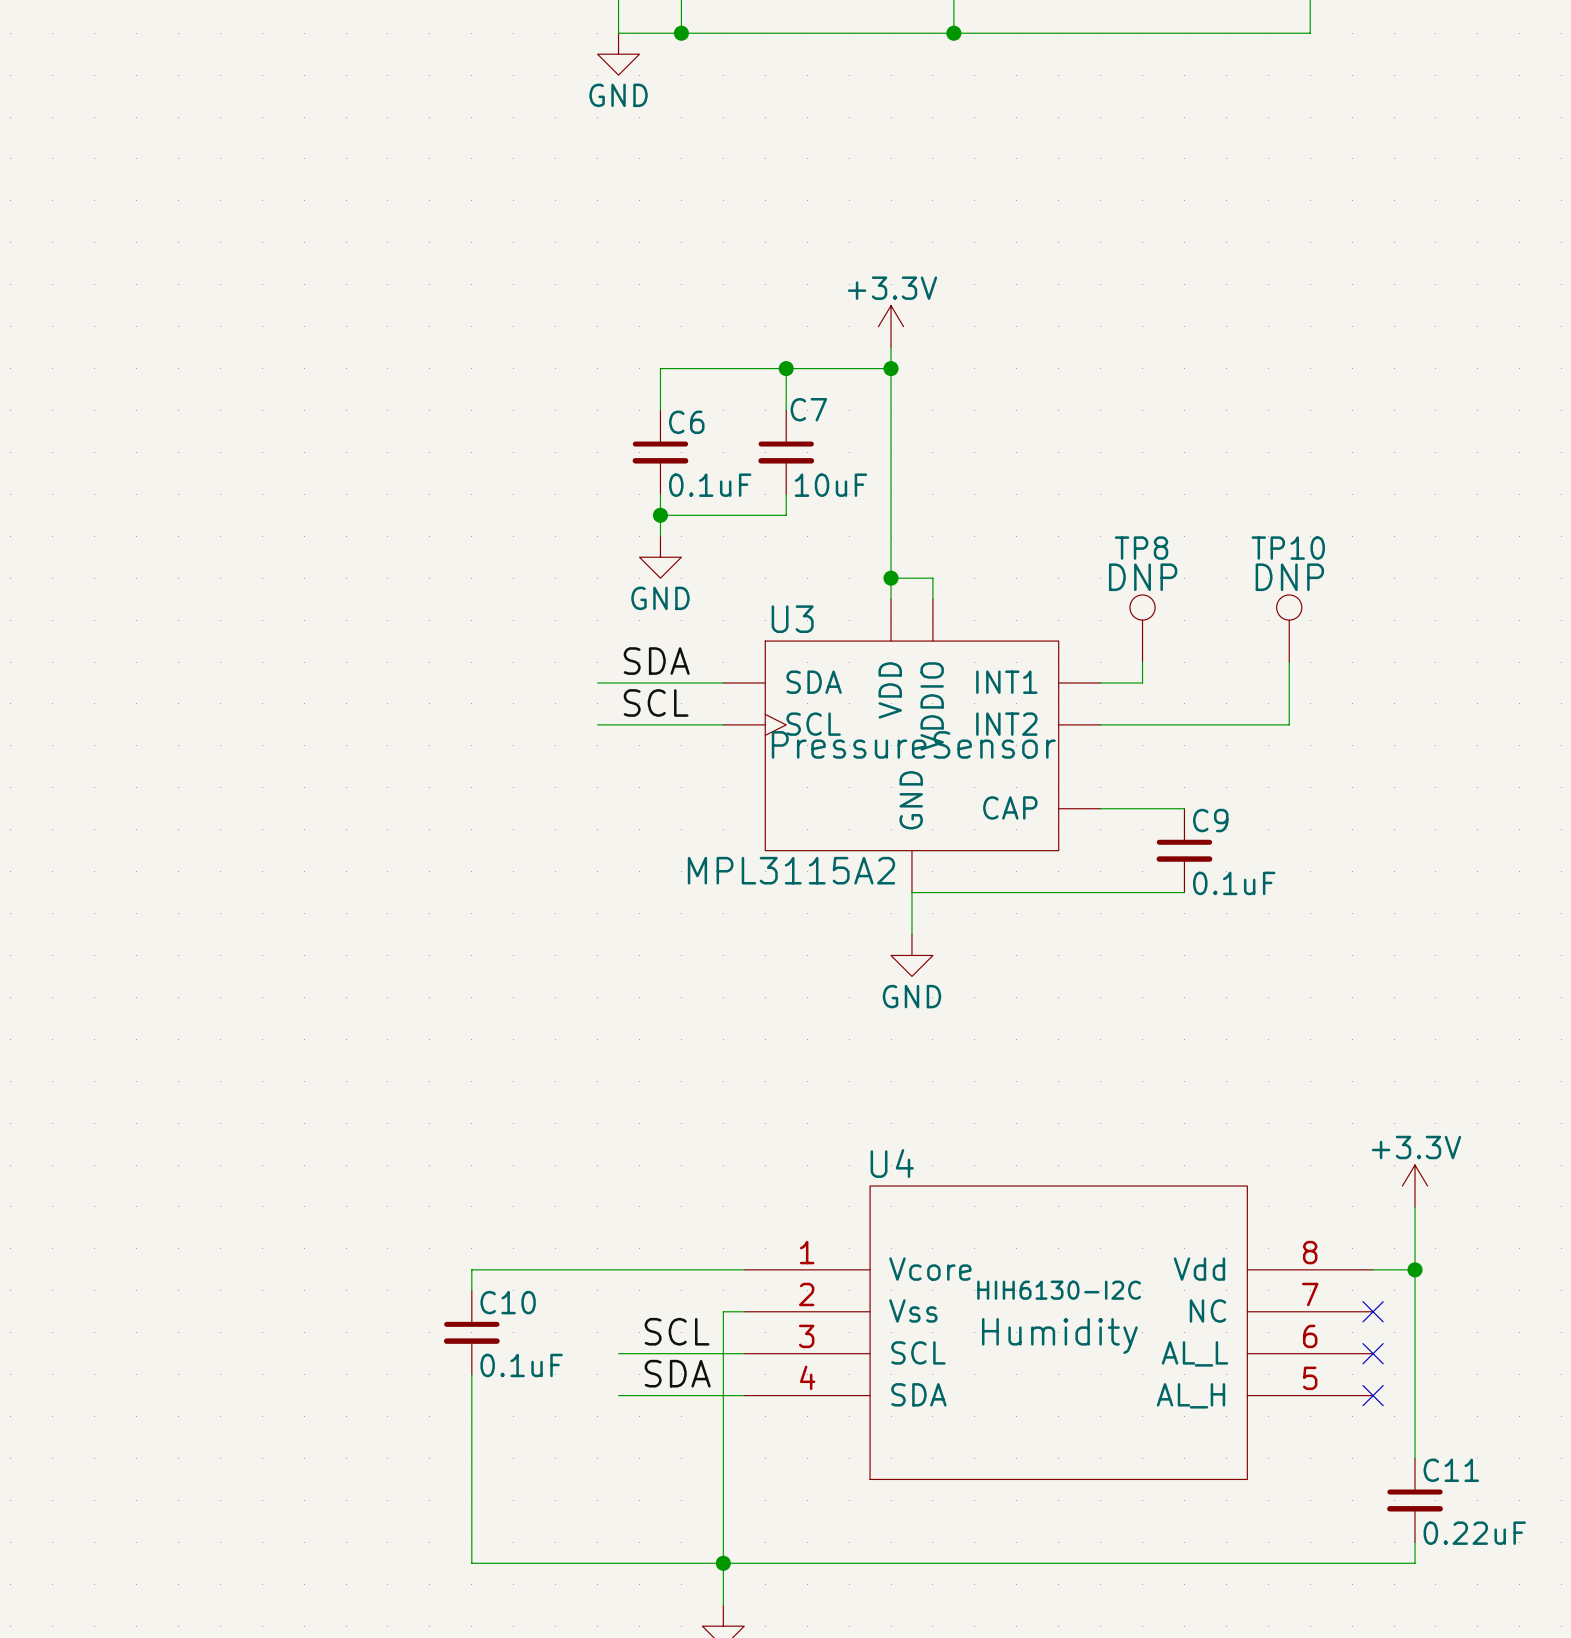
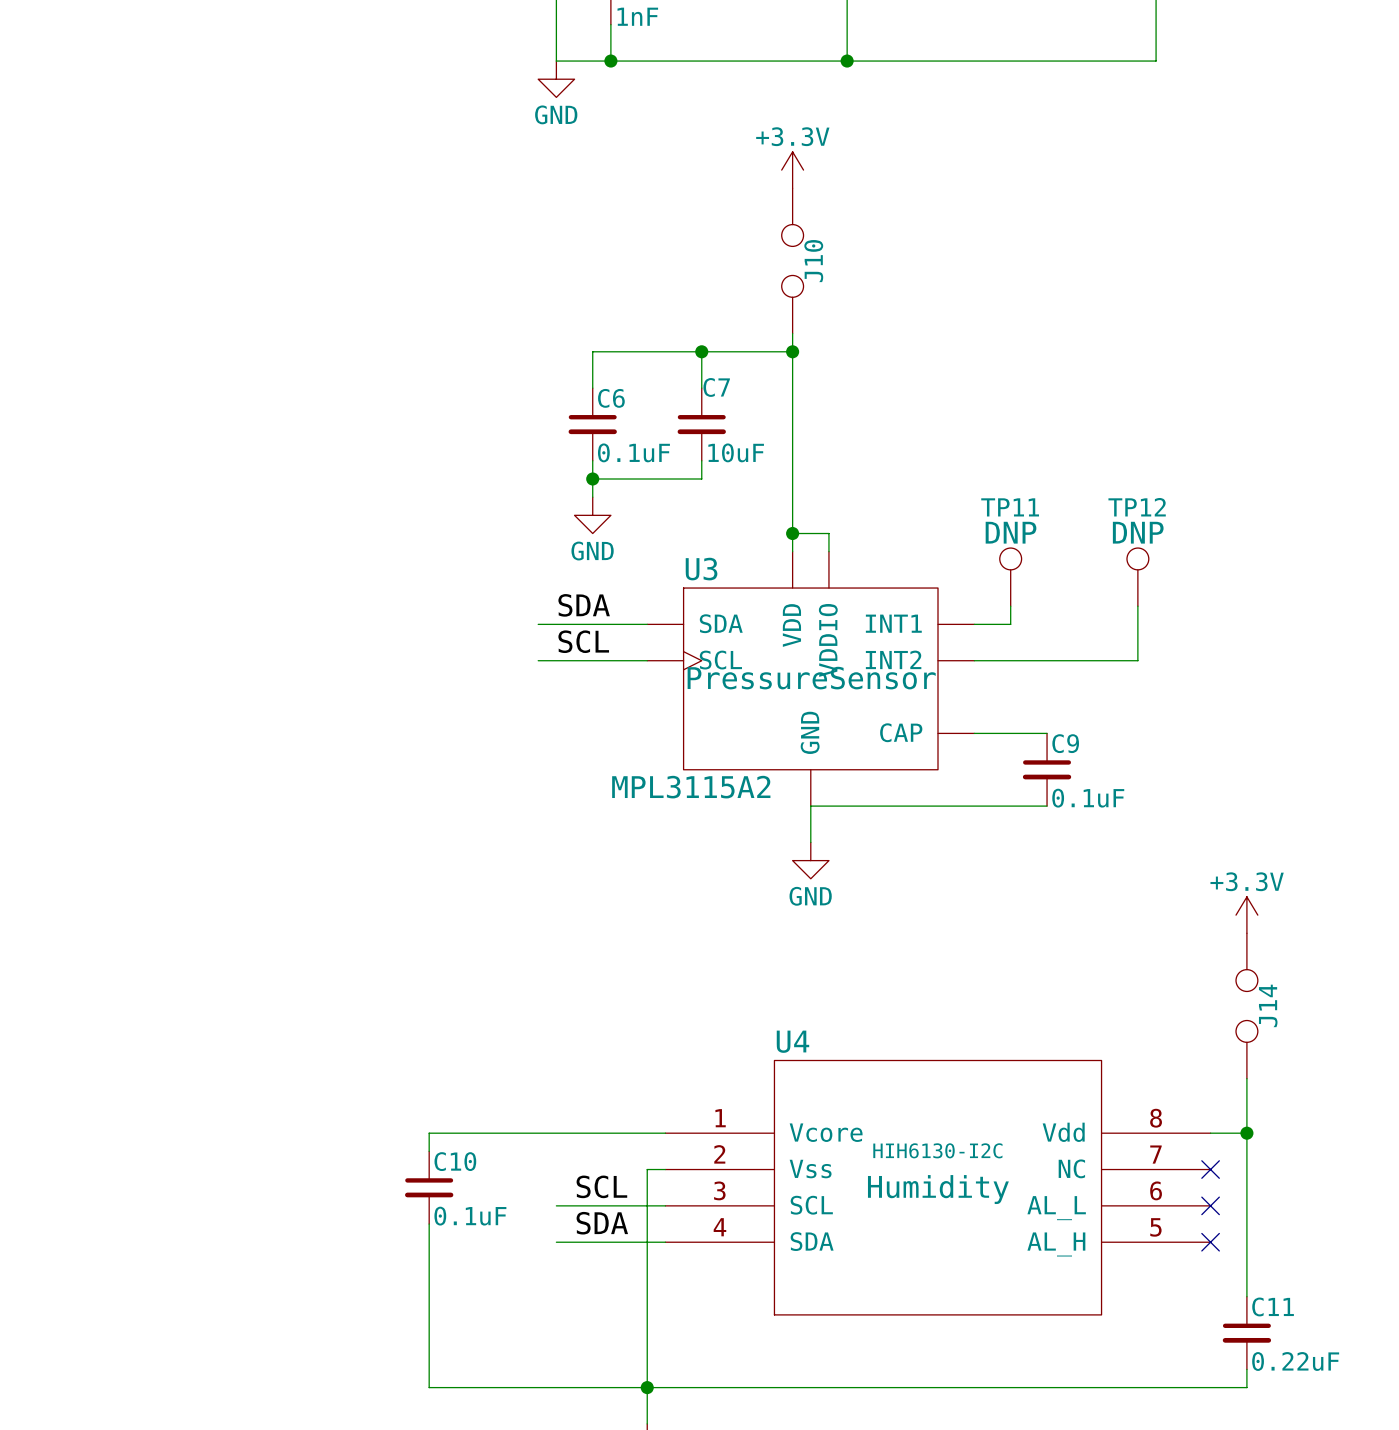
J10: none -> (792, 260)
power symbol position: +3.3V (891, 326) -> +3.3V (792, 170)
TP8 name: TP8 (1141, 548) -> TP11 (1010, 507)
TP10 name: TP10 (1288, 548) -> TP12 (1137, 507)
J14: none -> (1246, 1005)
power symbol position: +3.3V (1415, 1186) -> +3.3V (1246, 915)

